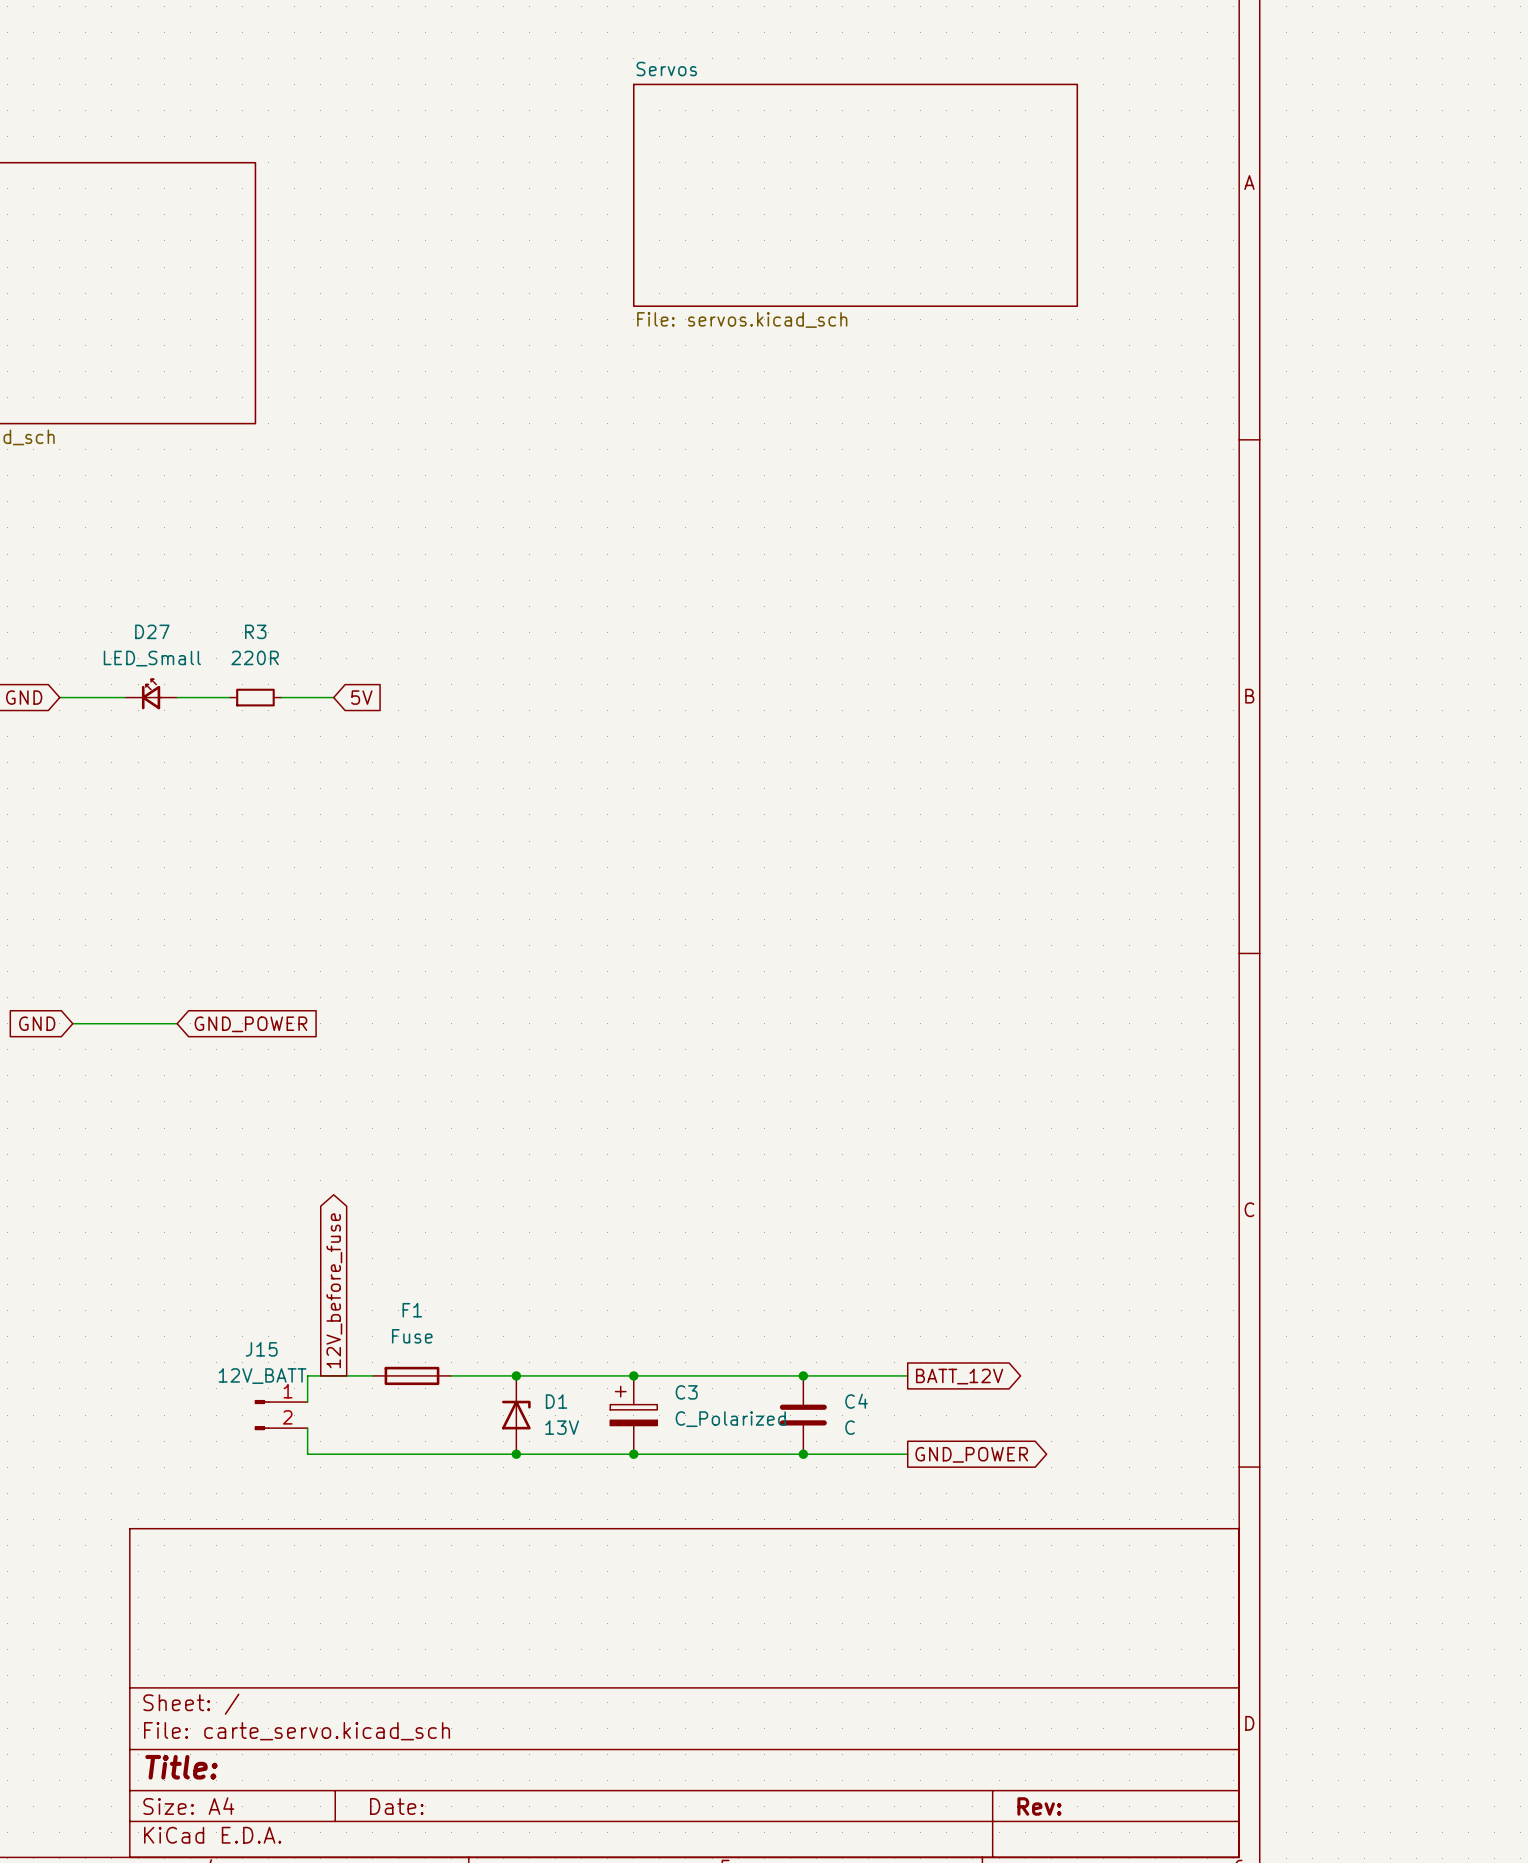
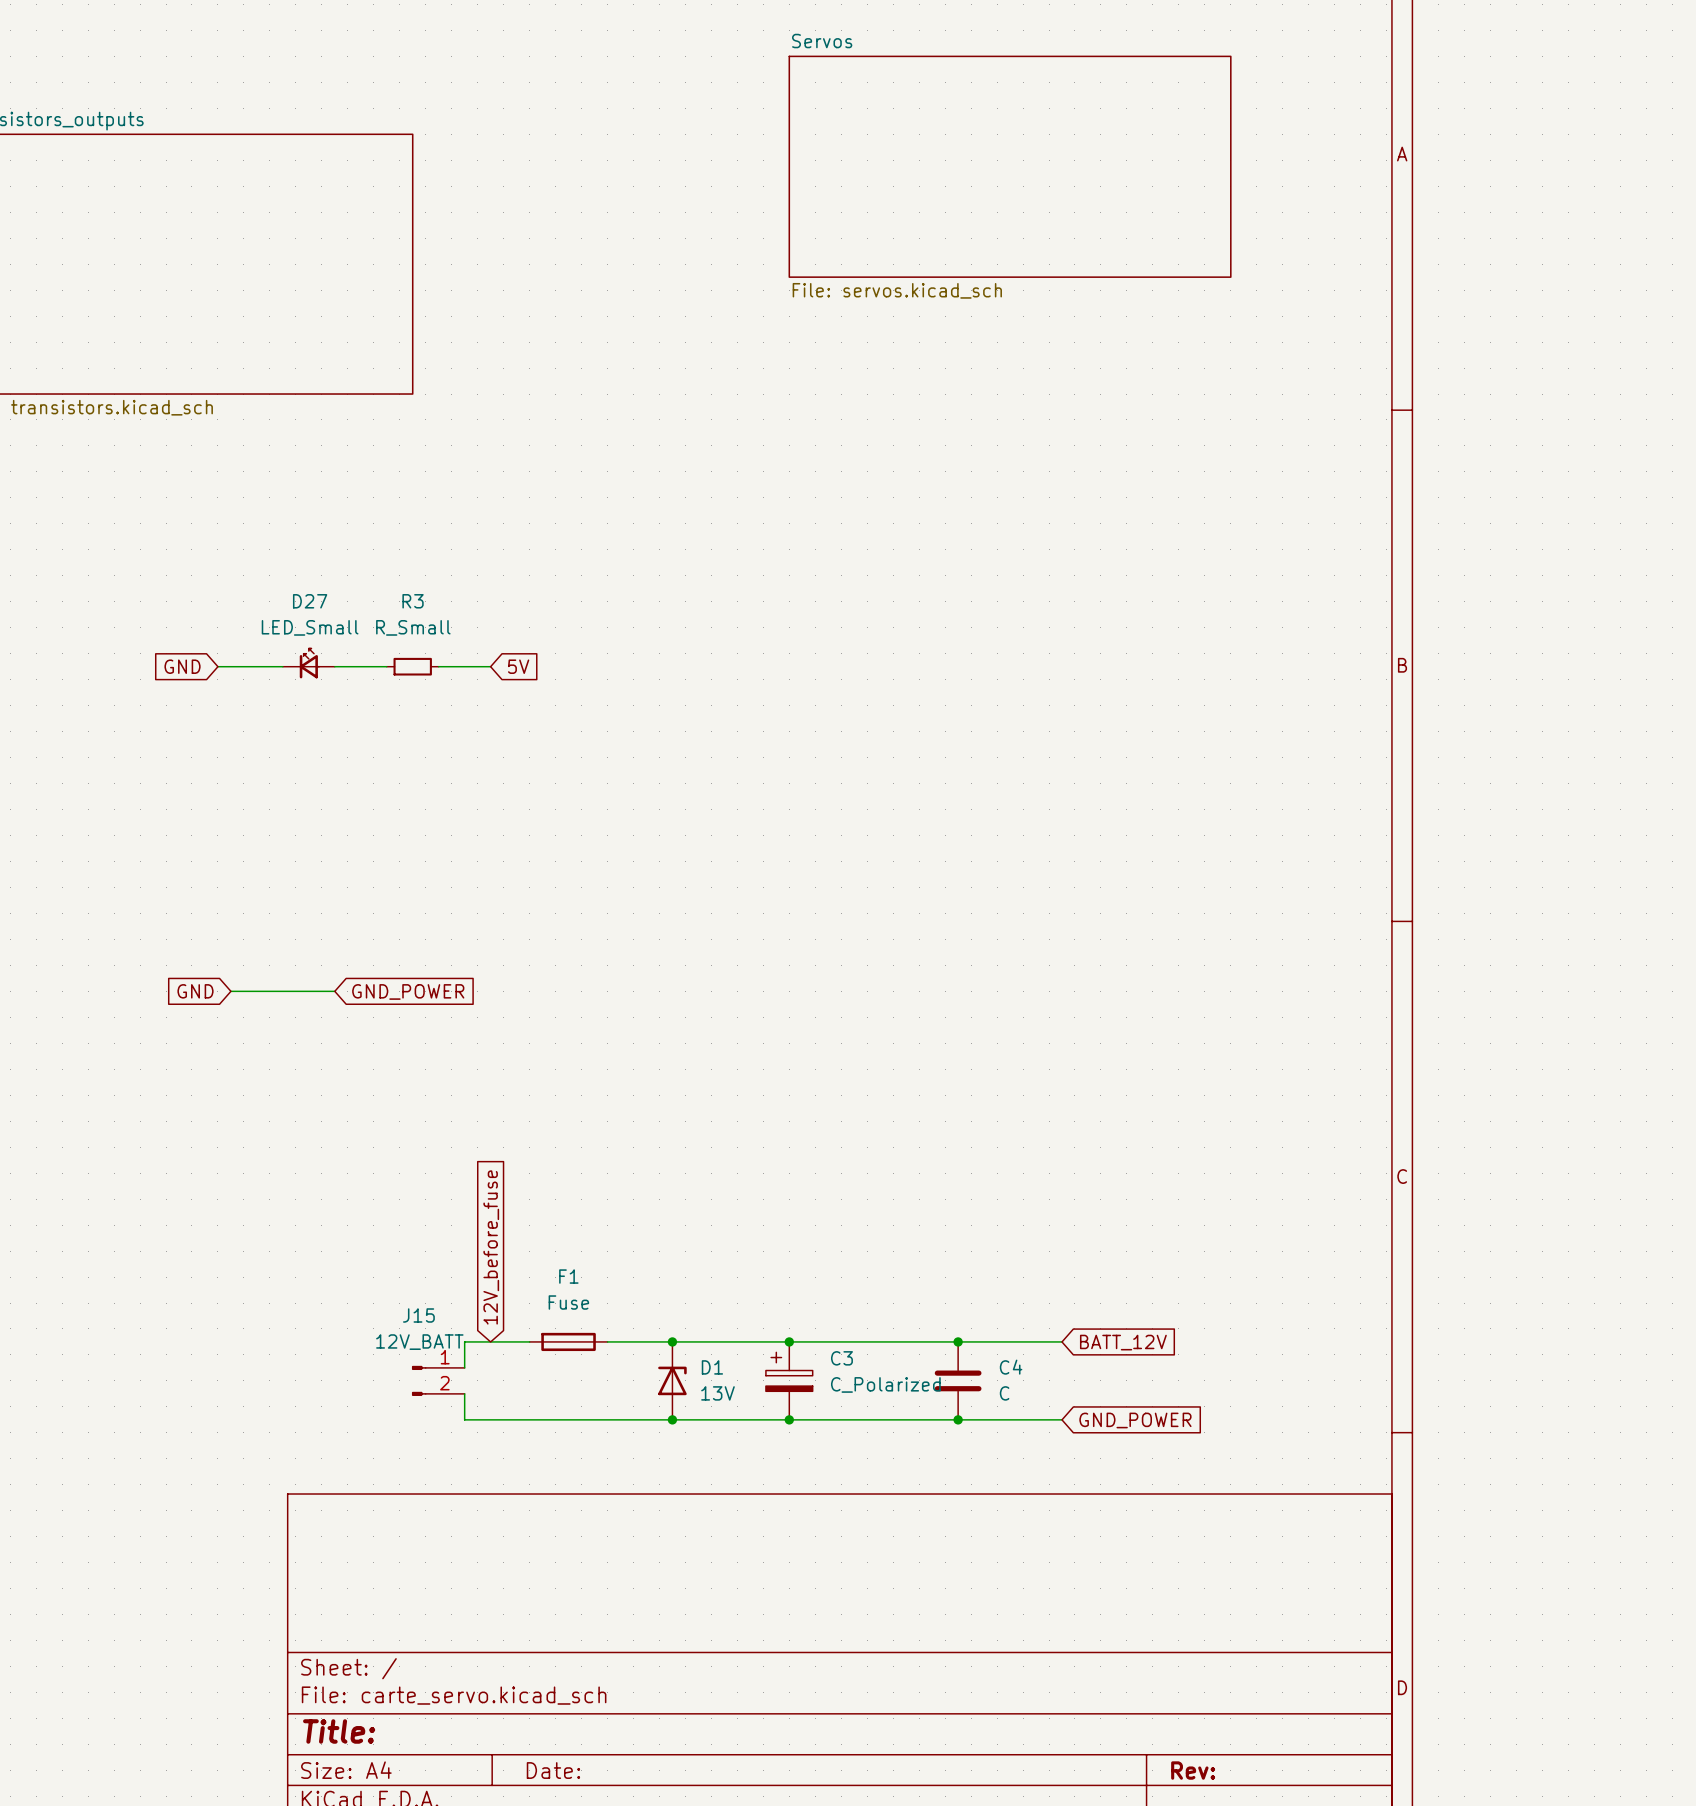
R3 value: 220R (255, 657) -> R_Small (413, 627)
global label shape: output (334, 1290) -> input (491, 1247)
global label shape: output (959, 1376) -> input (1123, 1342)
global label shape: output (971, 1454) -> input (1135, 1420)

